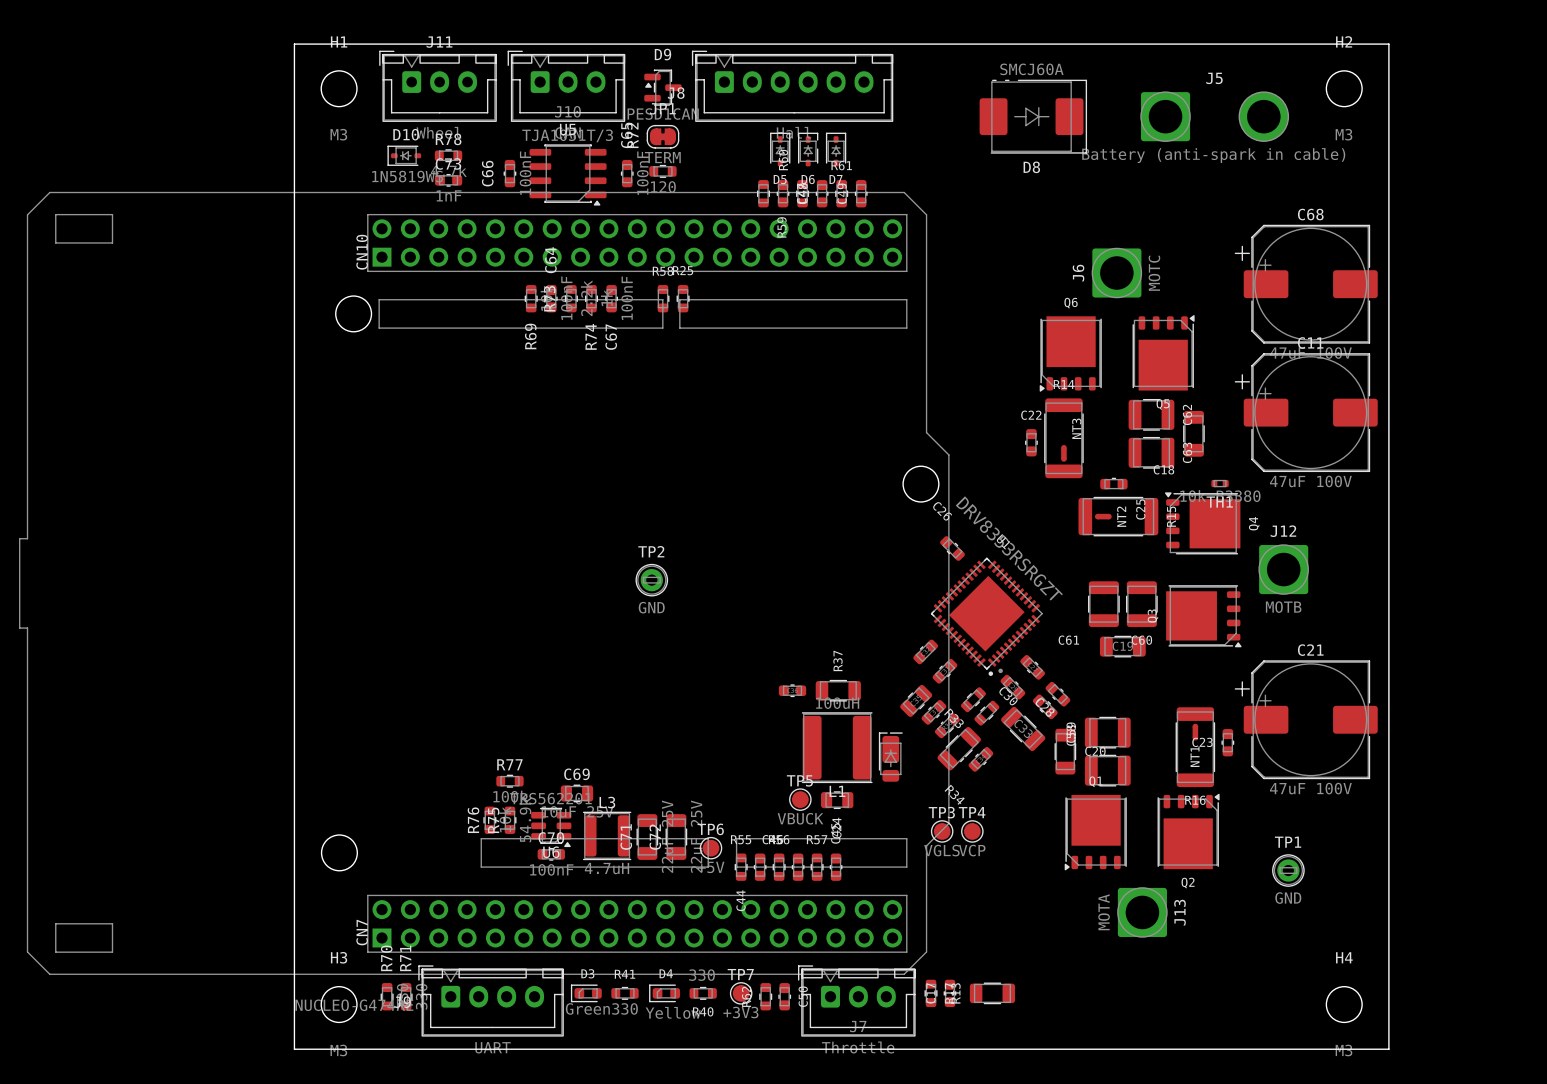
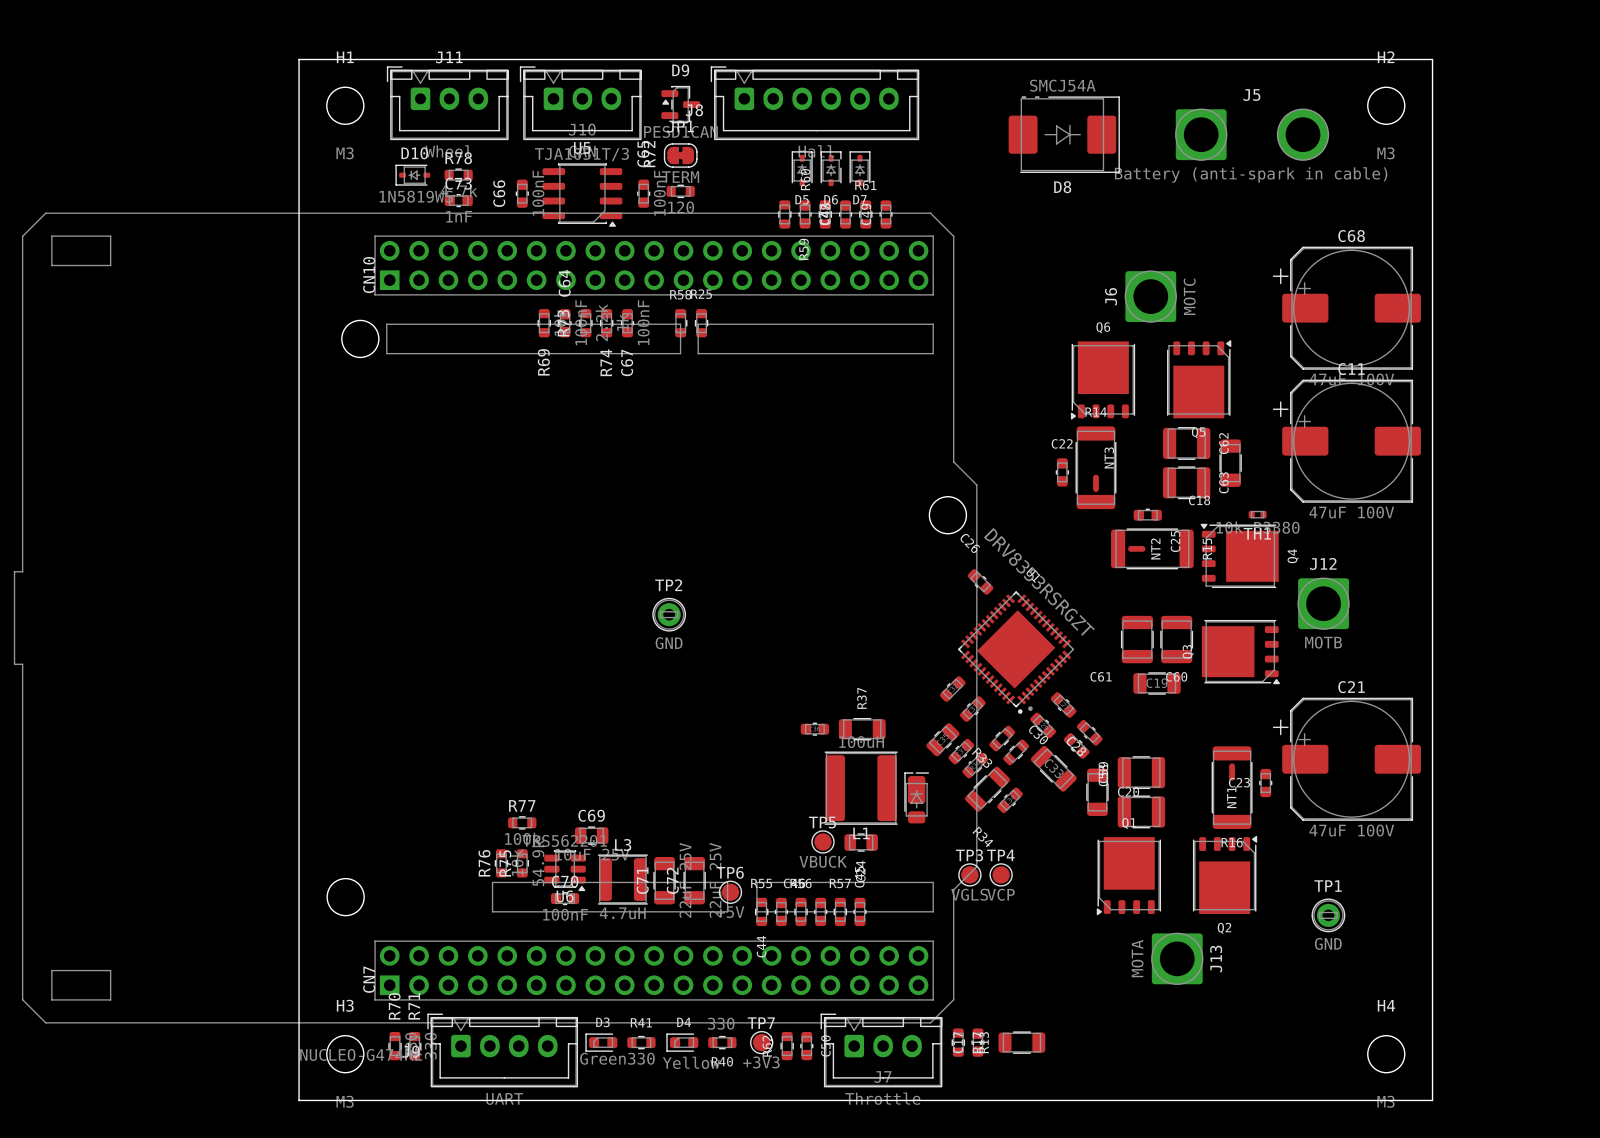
D8 value: SMCJ60A (1031, 69) -> SMCJ54A (1062, 85)

